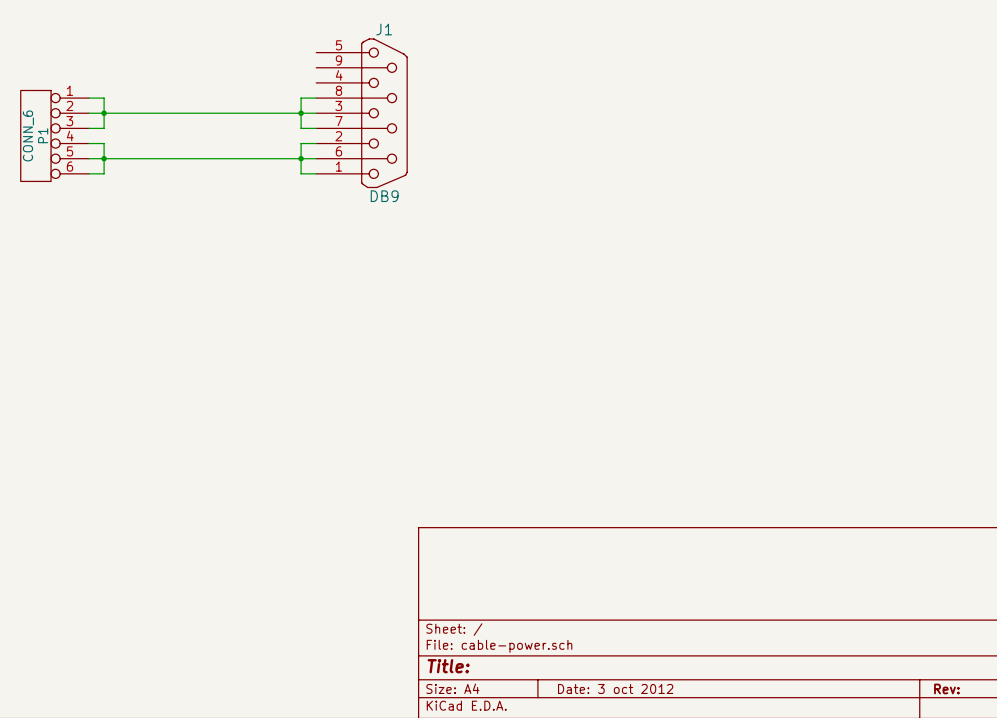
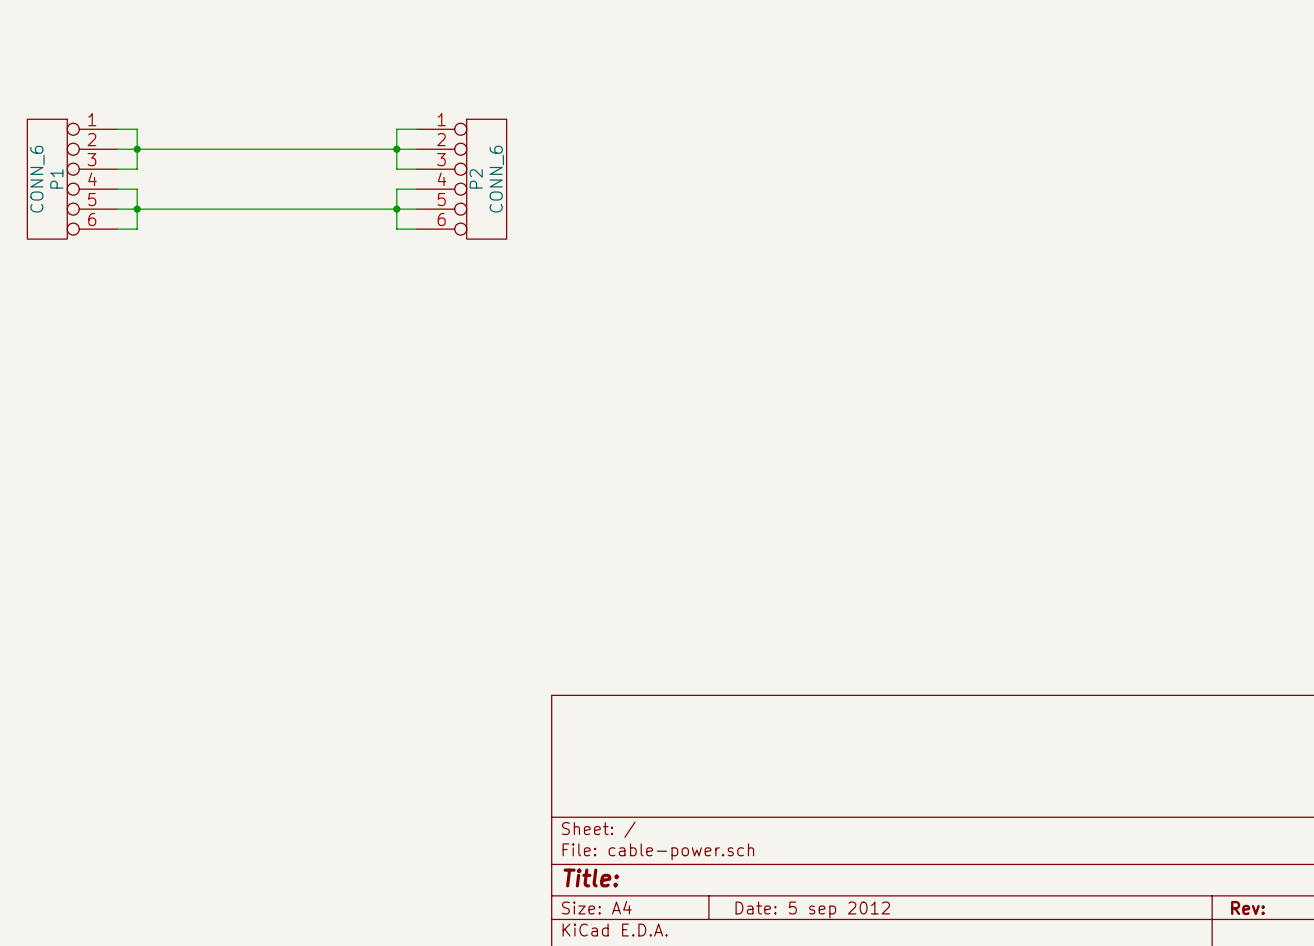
J1: DB9 (362, 113) -> none
P2: none -> CONN_6 (461, 179)
title block: Date: 3 oct 2012 (615, 688) -> Date: 5 sep 2012 (812, 909)

